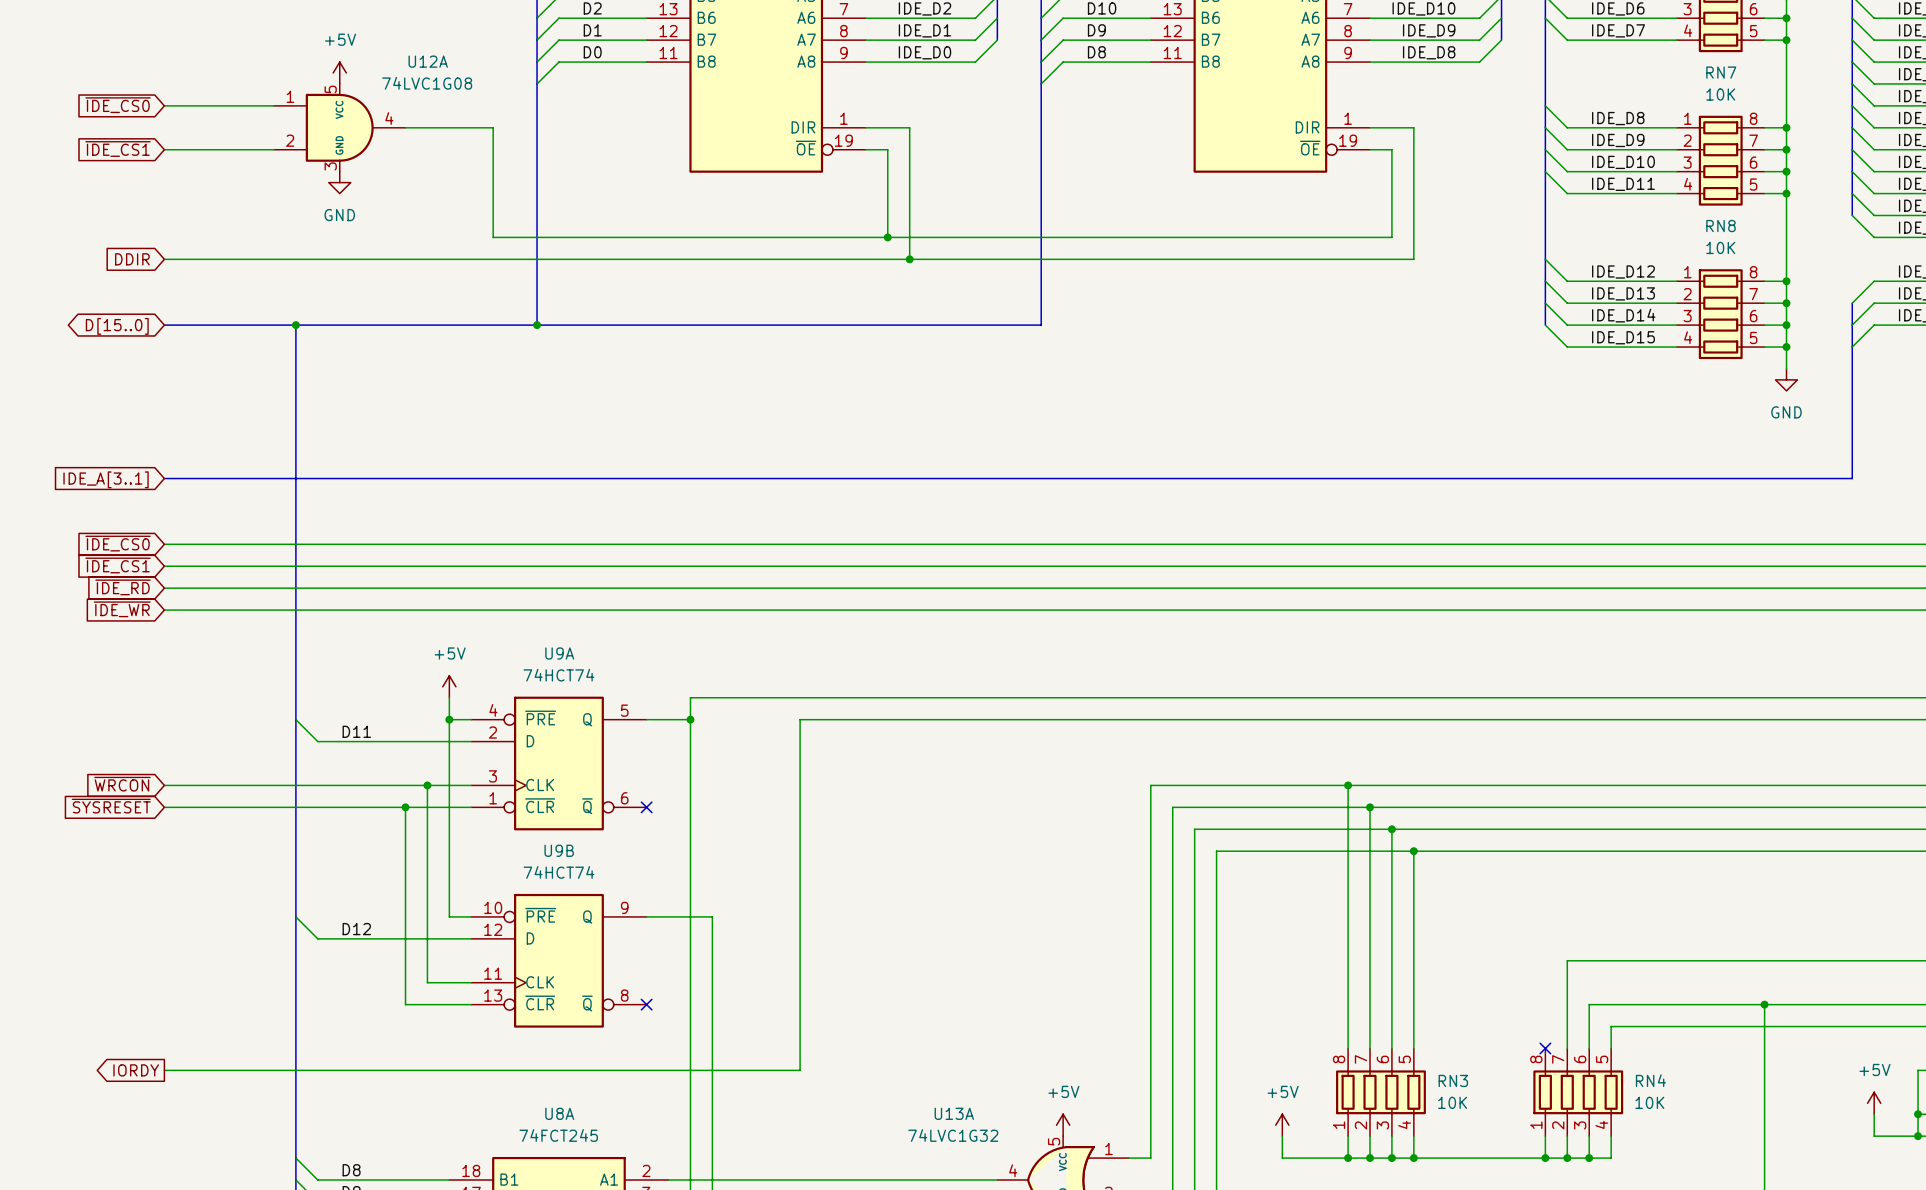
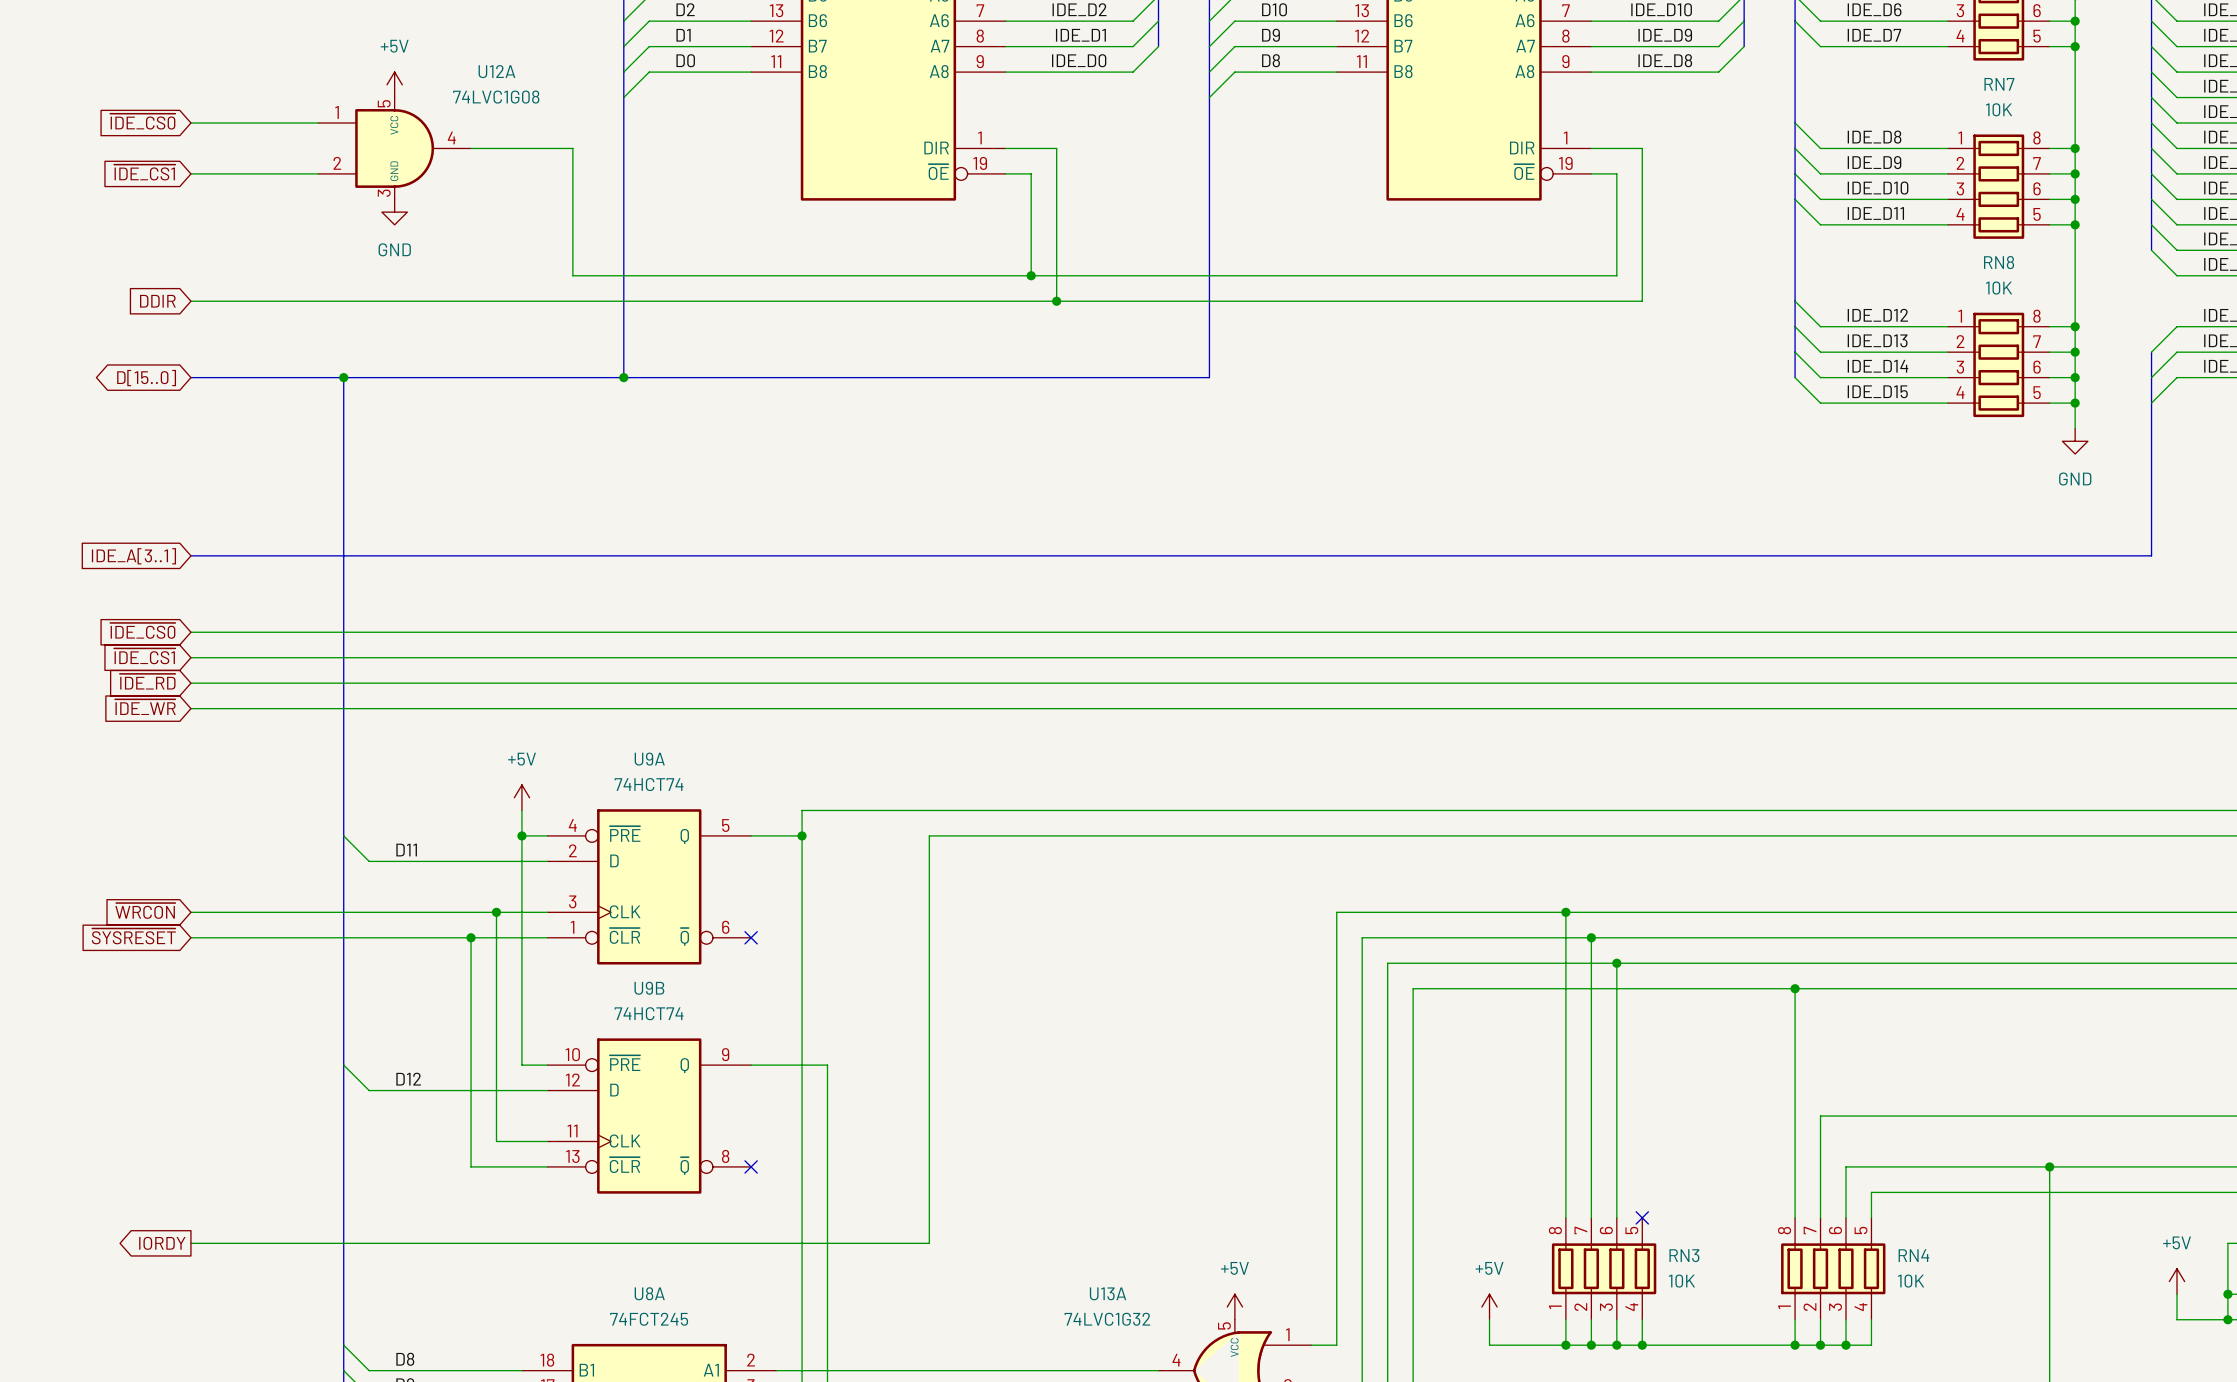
wire: (1413, 851) (1413, 1048) -> (1795, 988) (1795, 1217)
junction: (1413, 851) -> none
junction: none -> (1795, 988)
no-connect mark: none -> (1642, 1217)
no-connect mark: (1545, 1048) -> none

